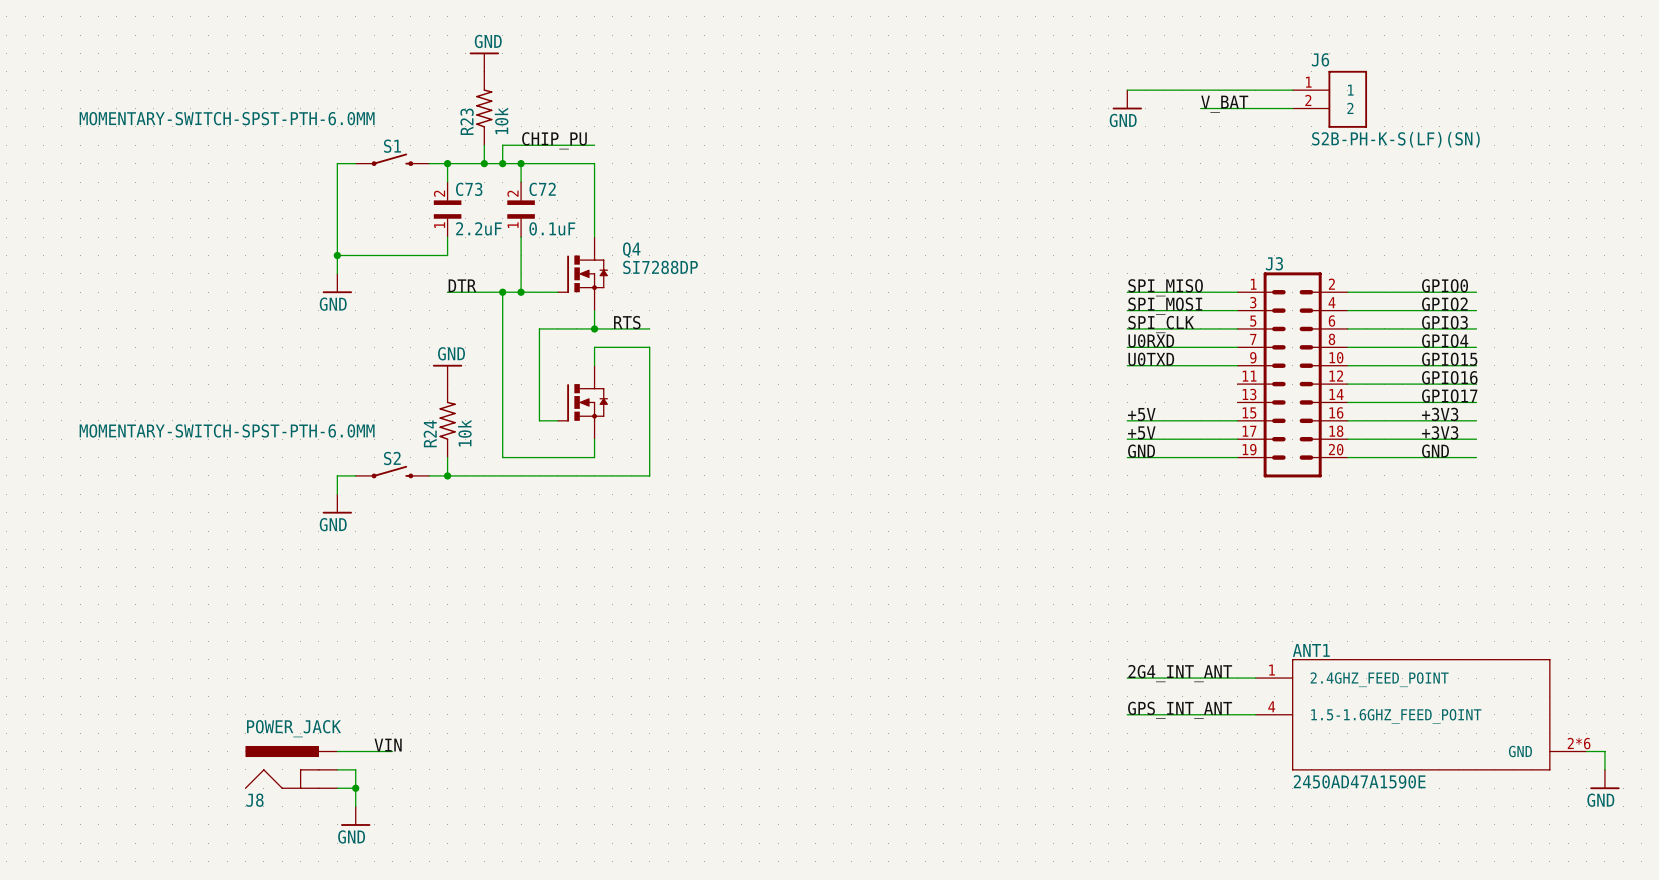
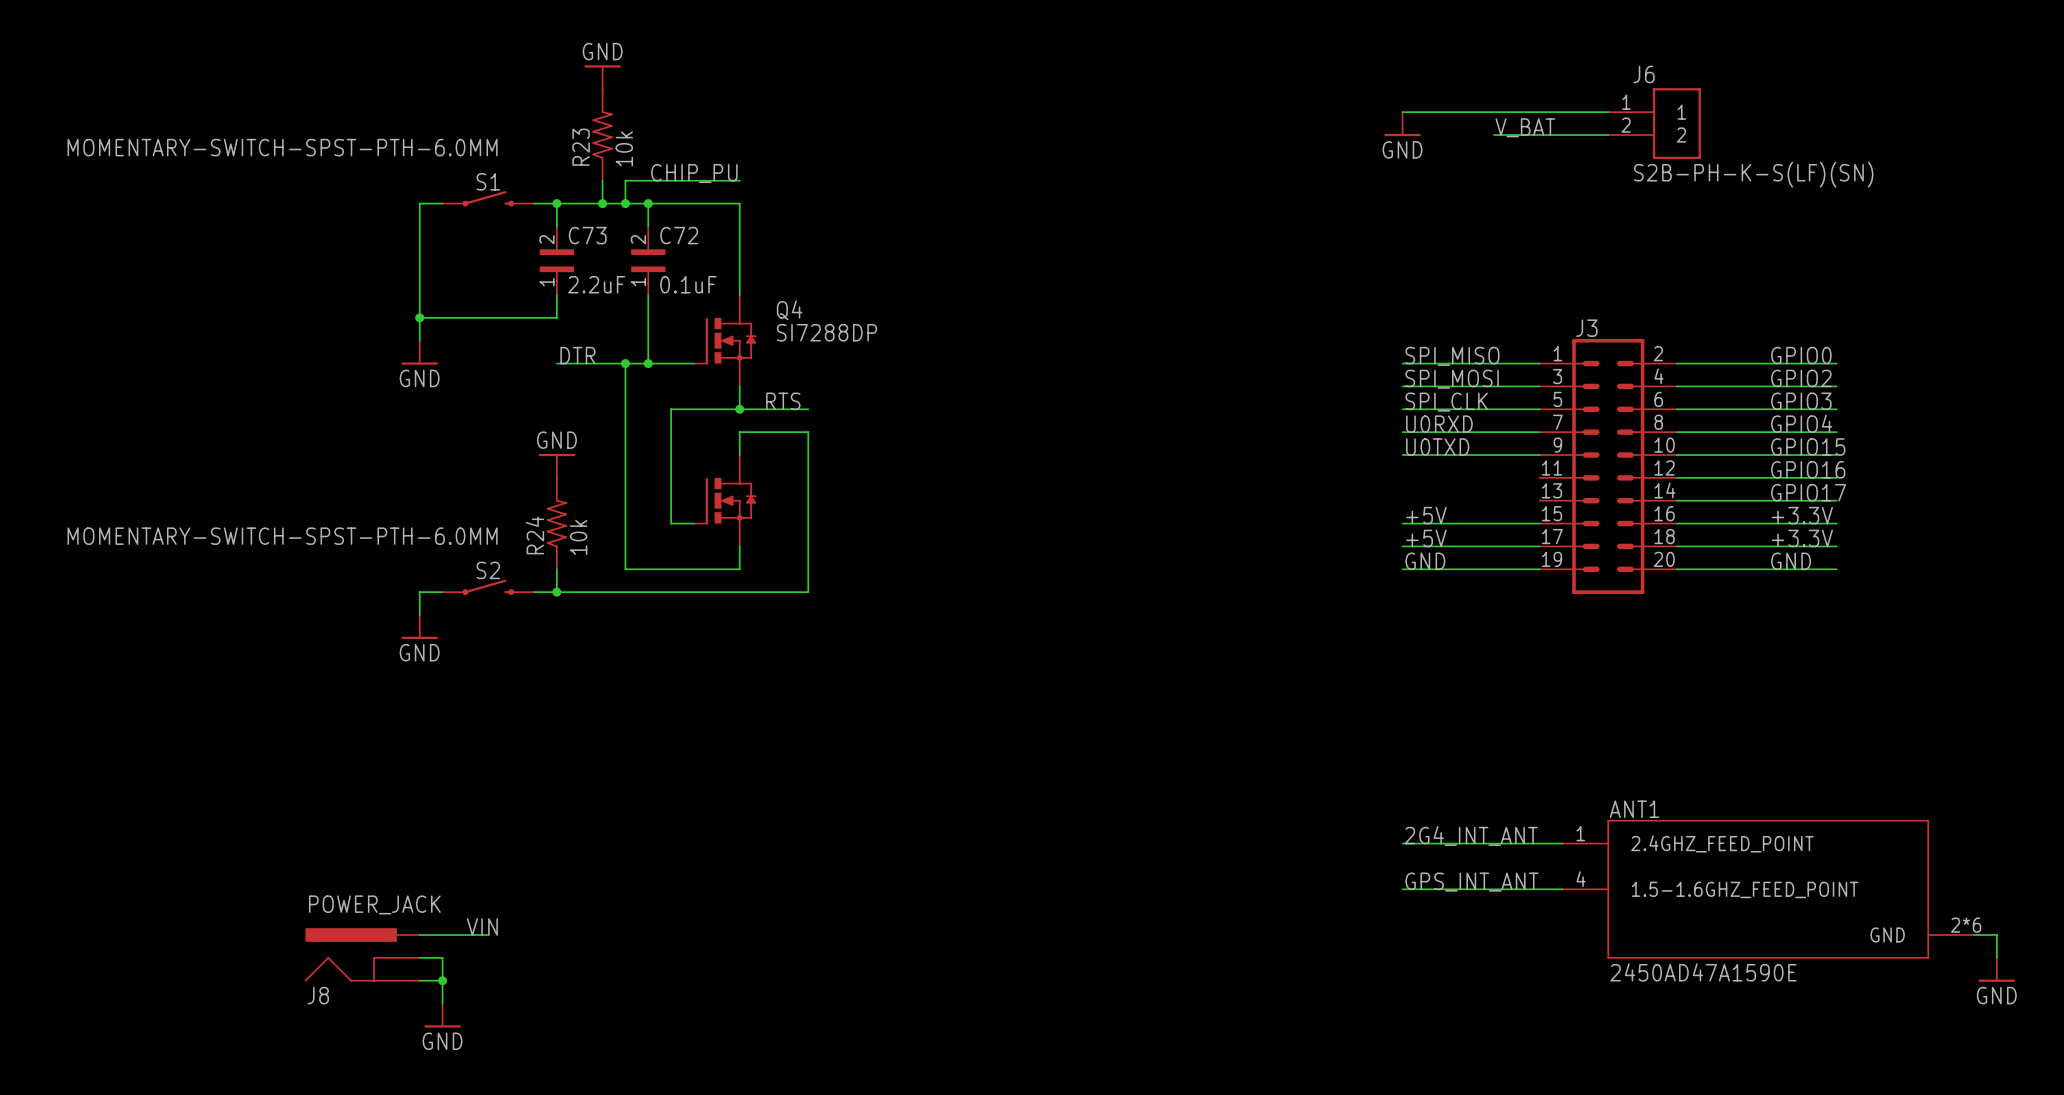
label: +3V3 (1440, 414) -> +3.3V (1802, 515)
label: +3V3 (1440, 432) -> +3.3V (1802, 538)

